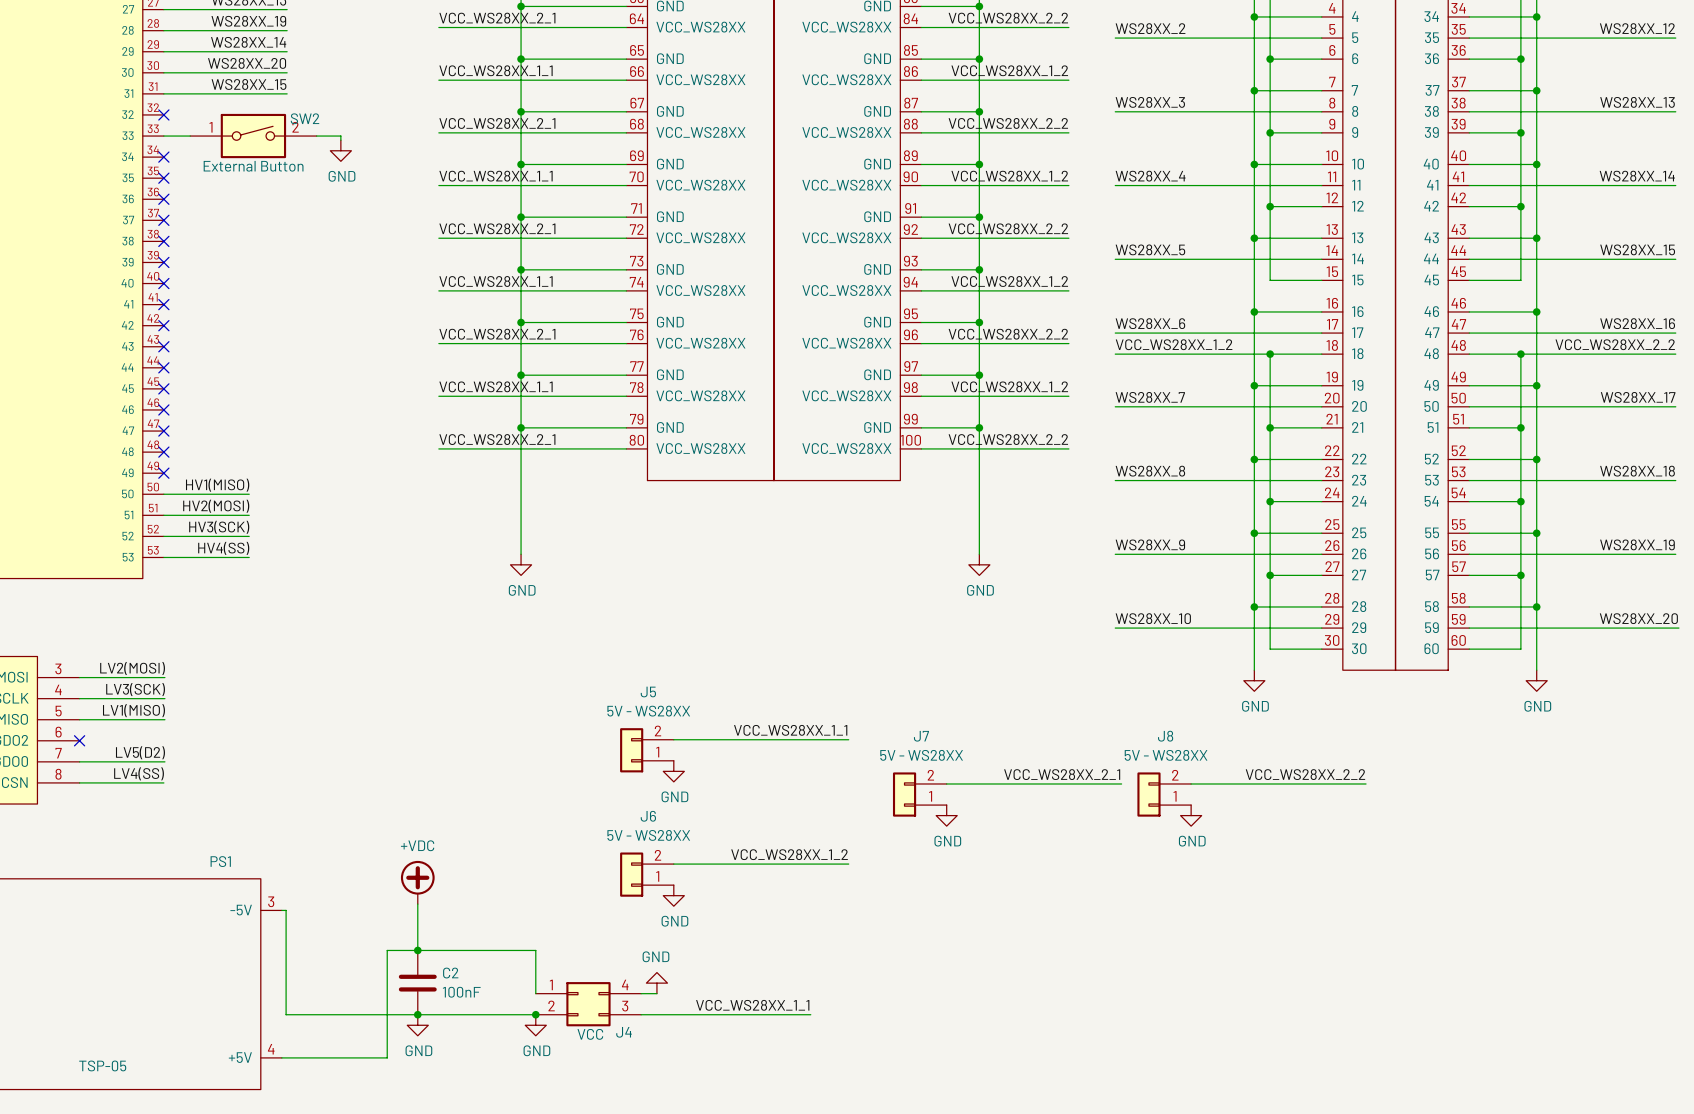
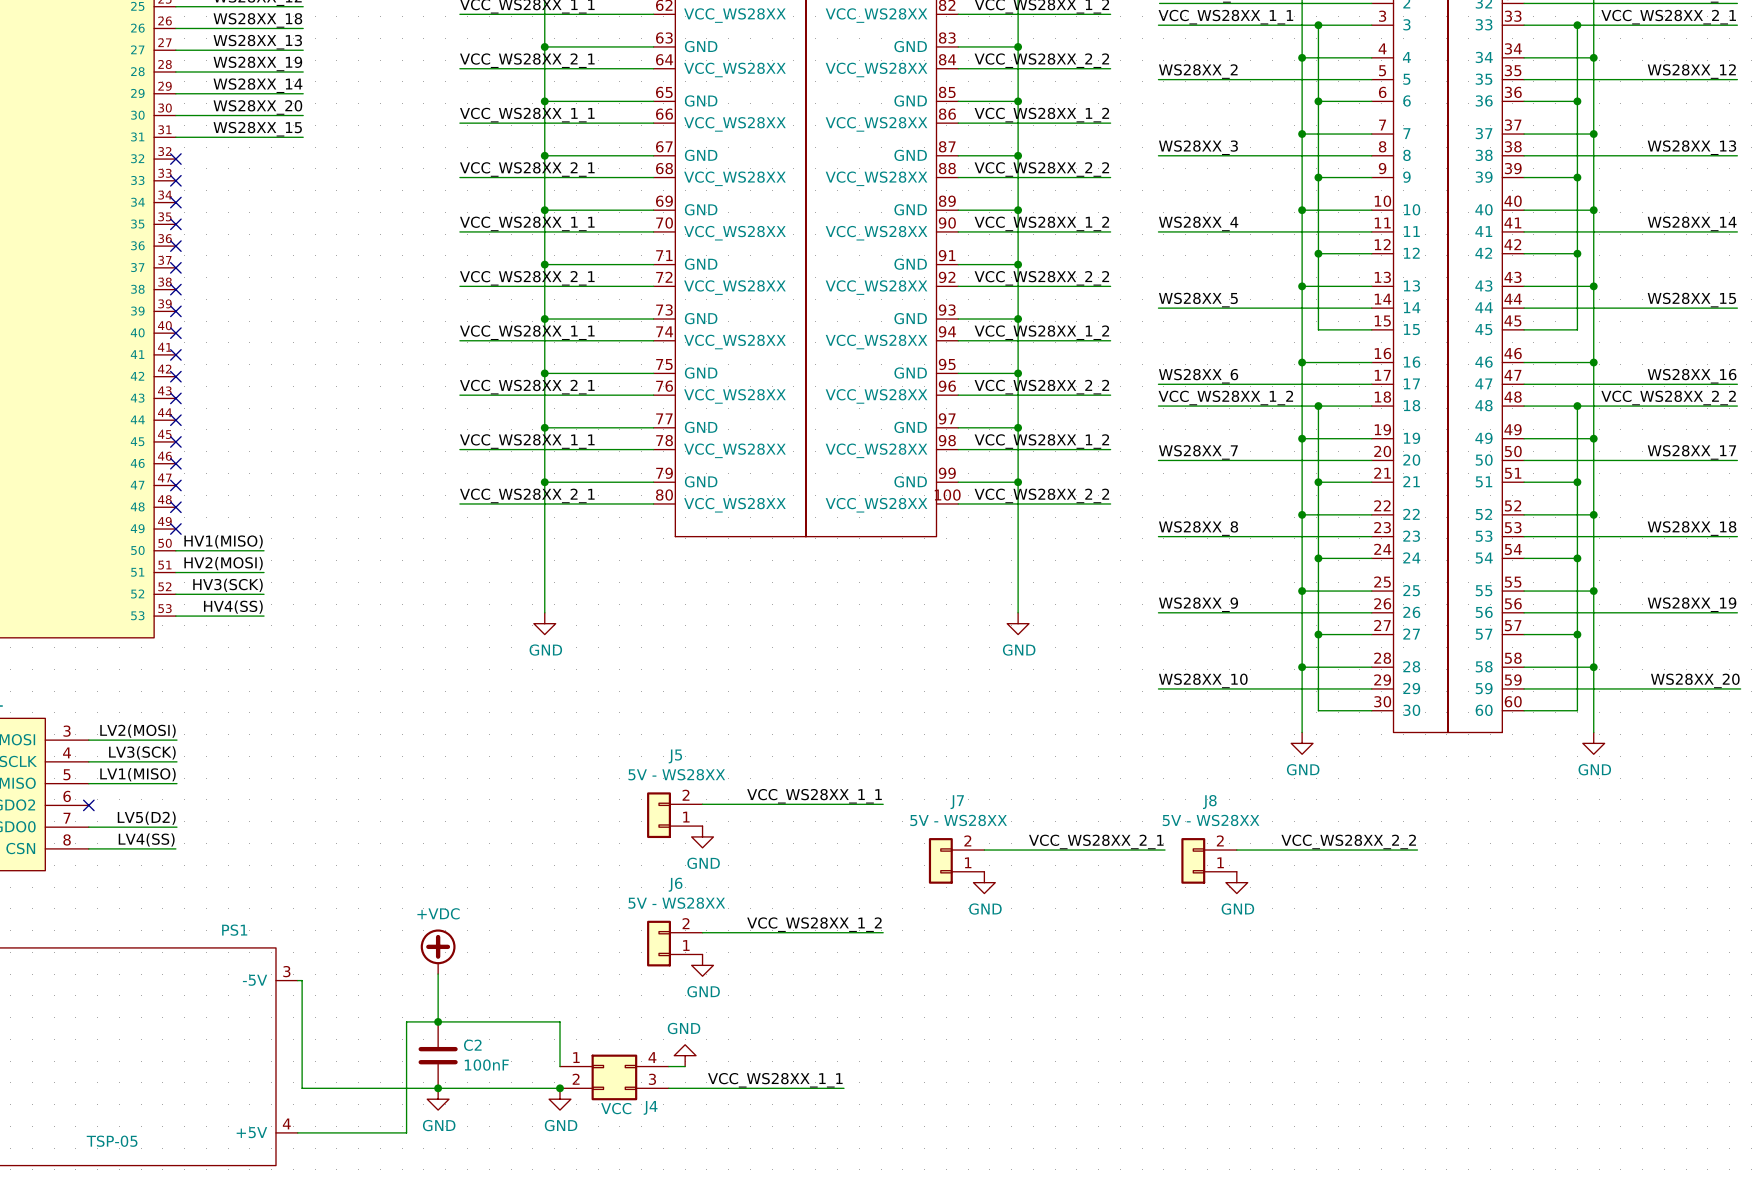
wire: (163, 136) (190, 136) -> none
no-connect mark: none -> (175, 180)
SW2: External Button (253, 136) -> none
wire: (316, 136) (340, 136) (340, 140) -> none
power symbol: GND (340, 150) -> none

